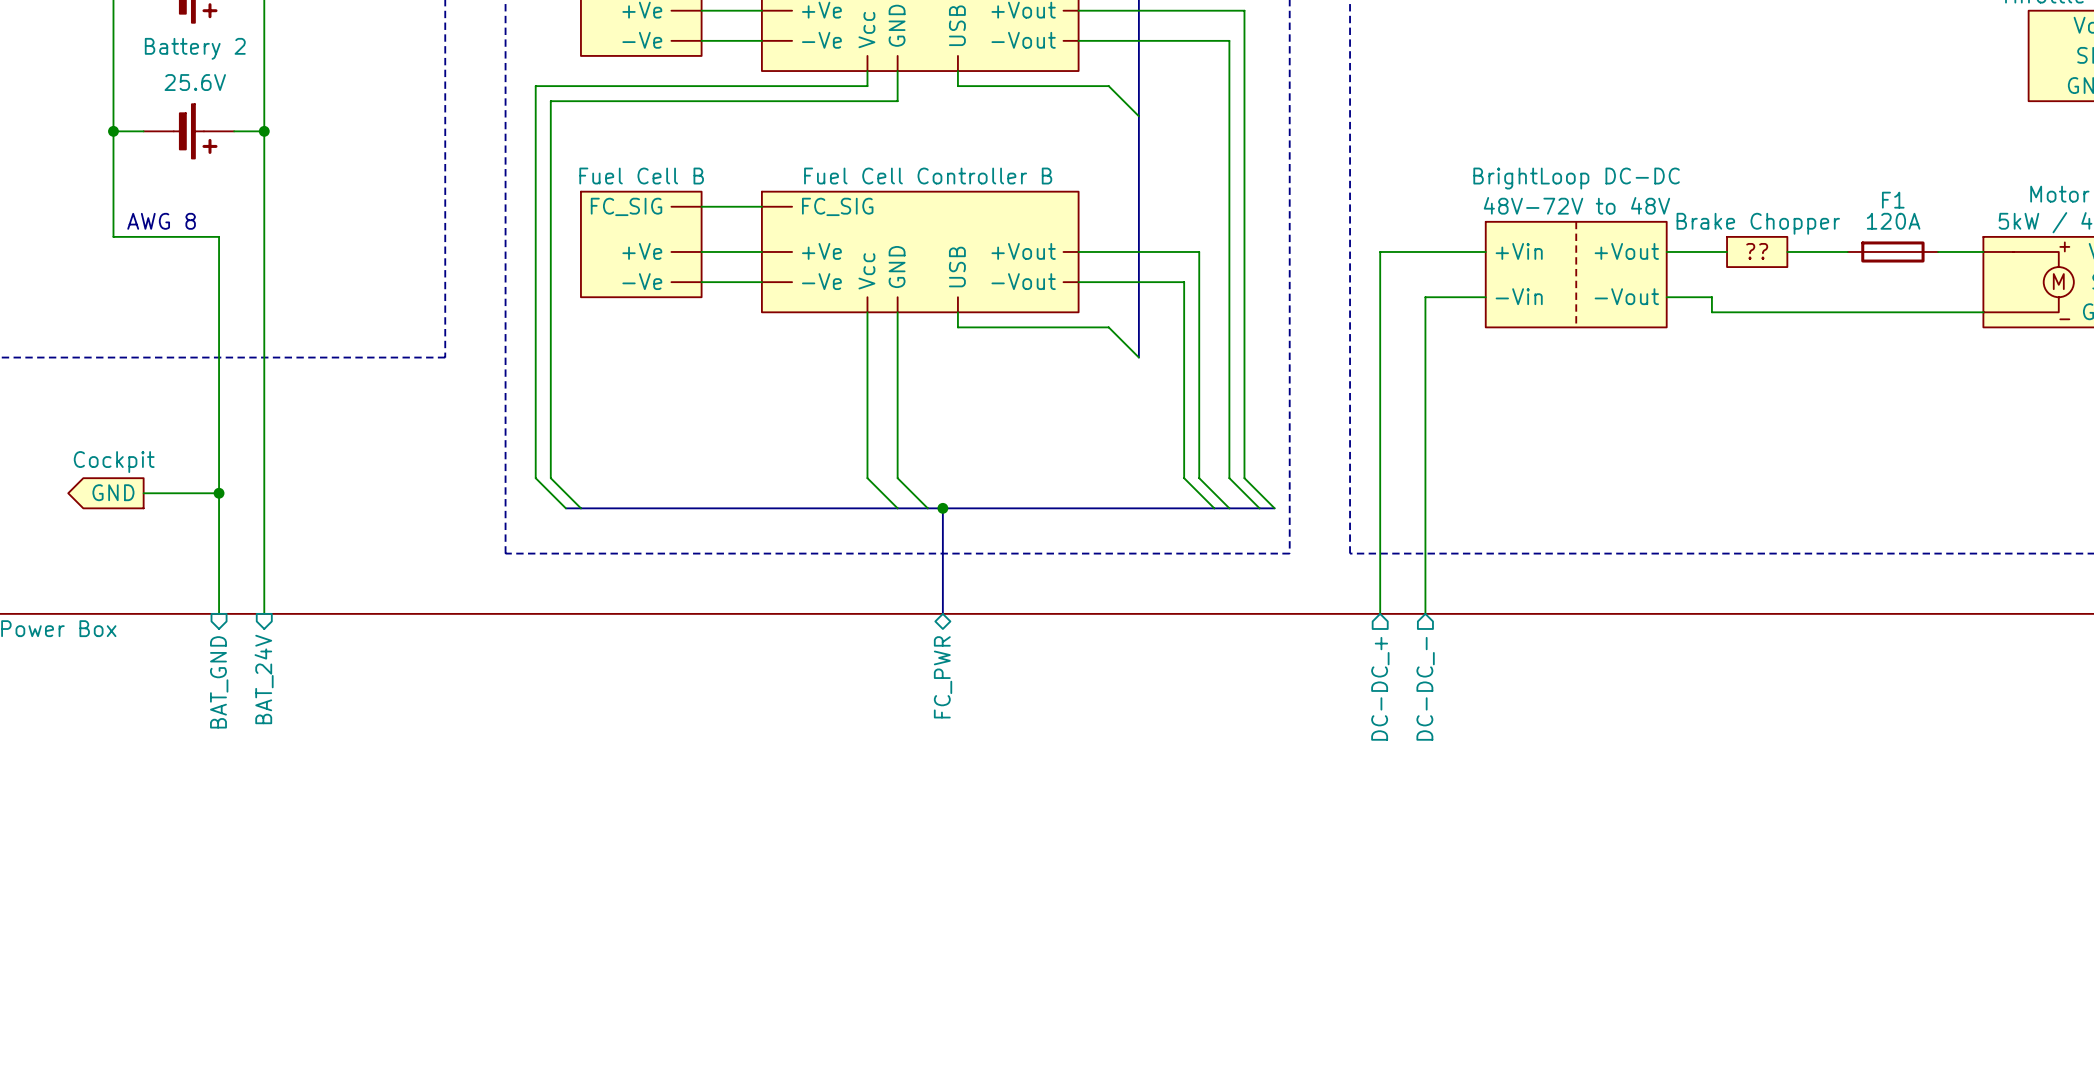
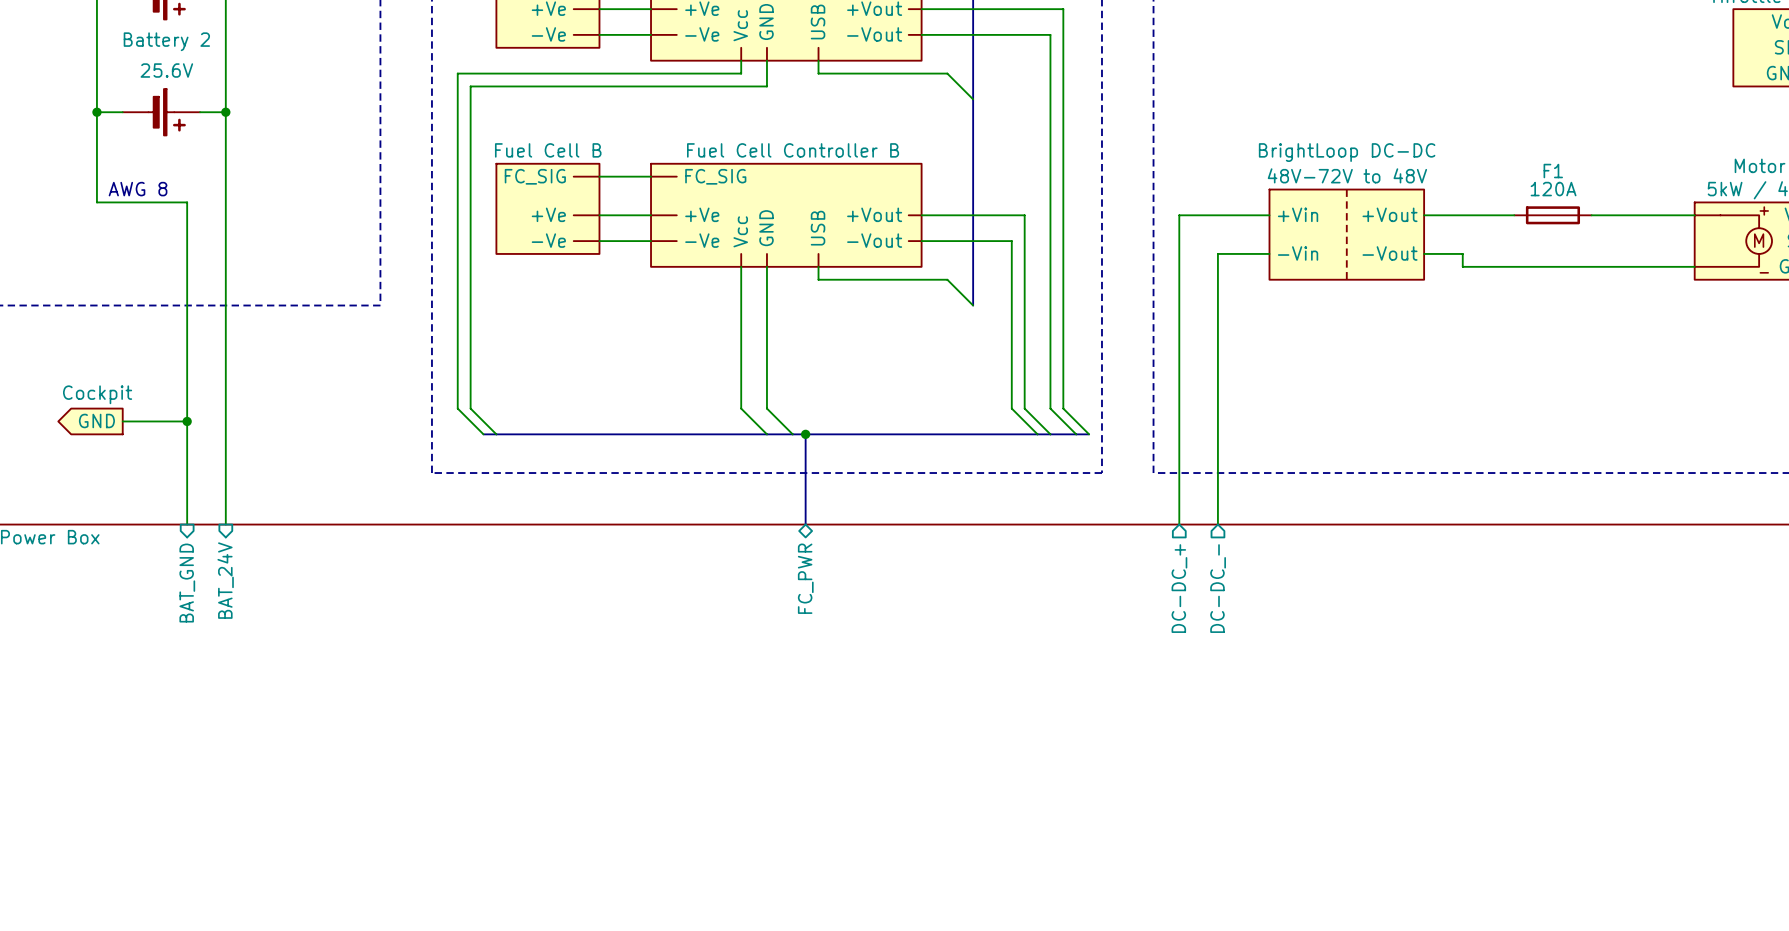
part: (1757, 251) -> none
F1 position: (1892, 251) -> (1552, 215)

